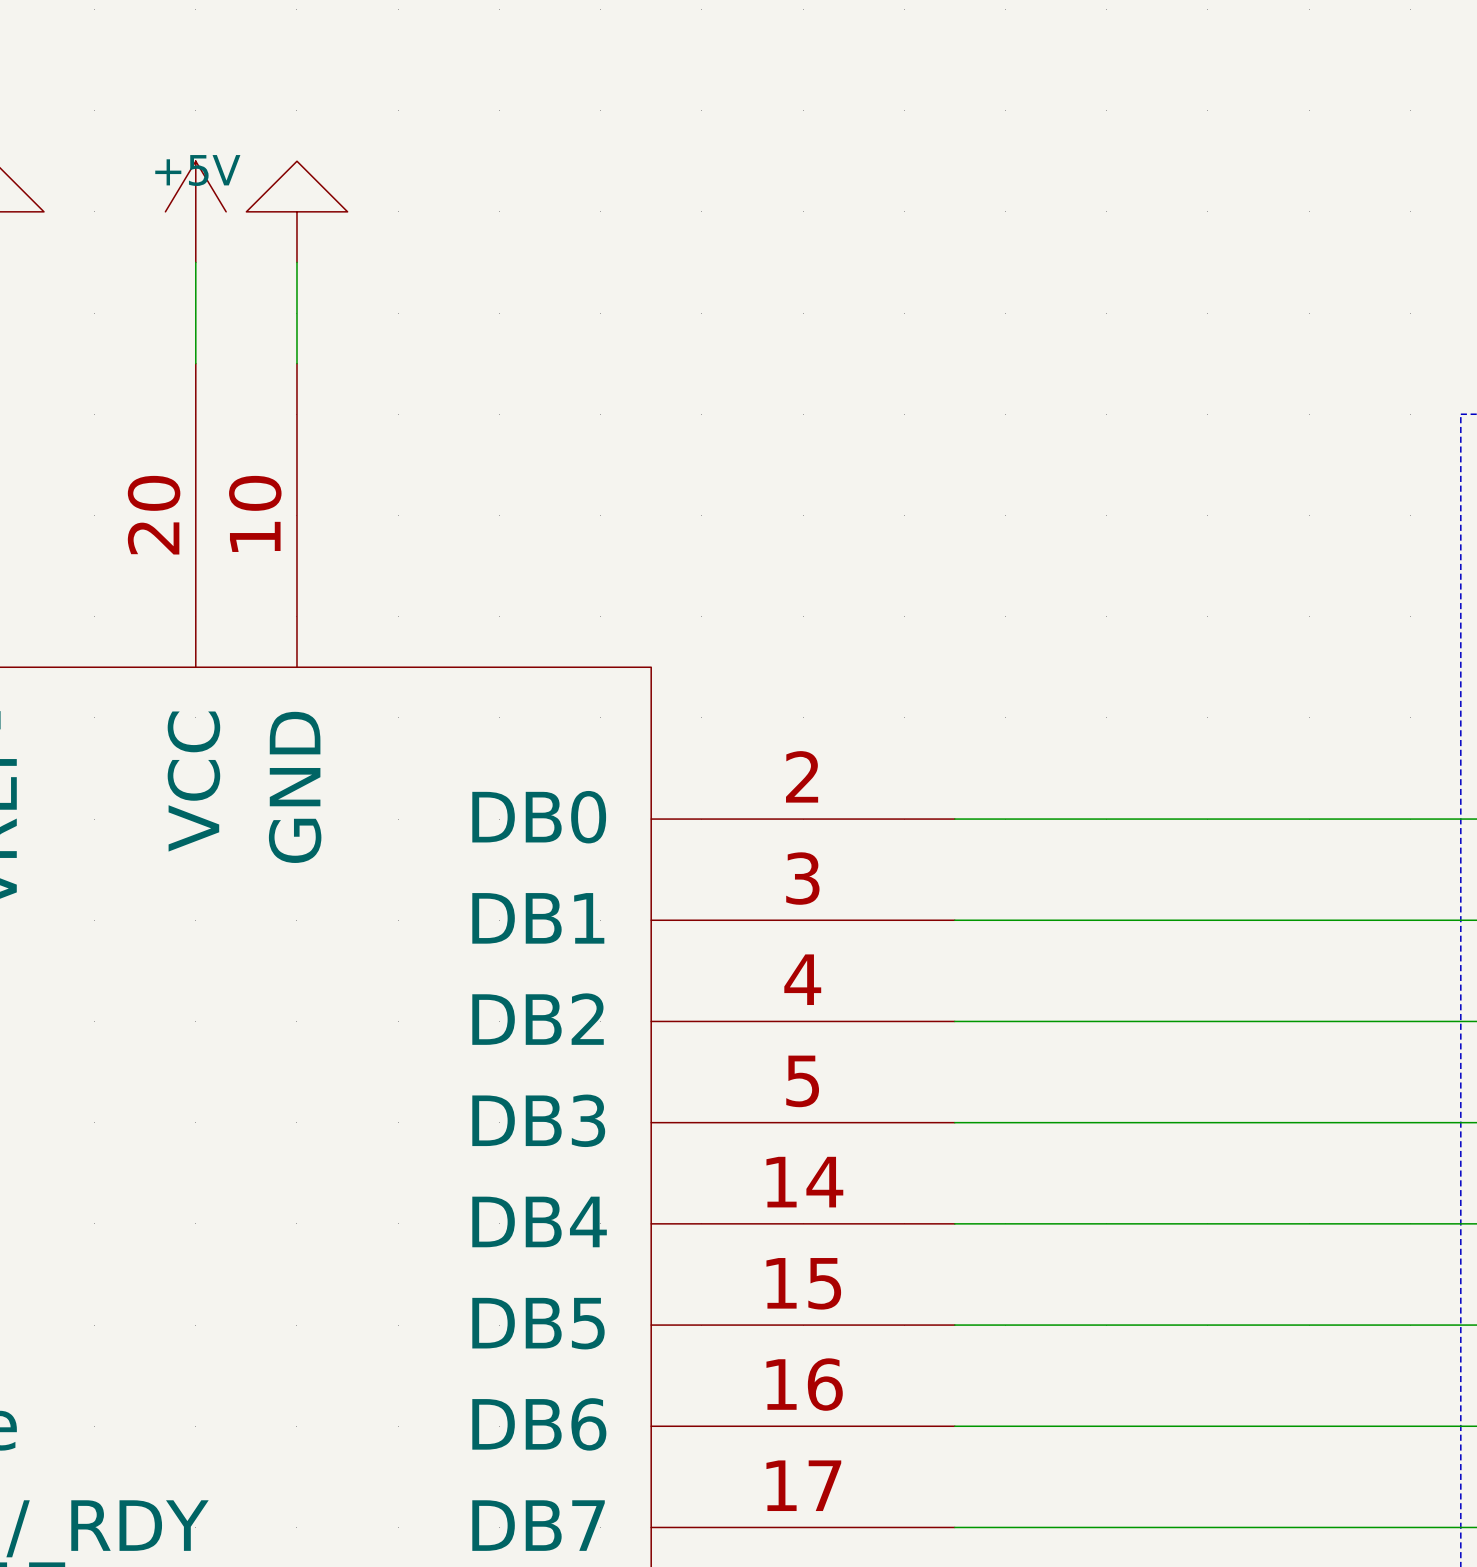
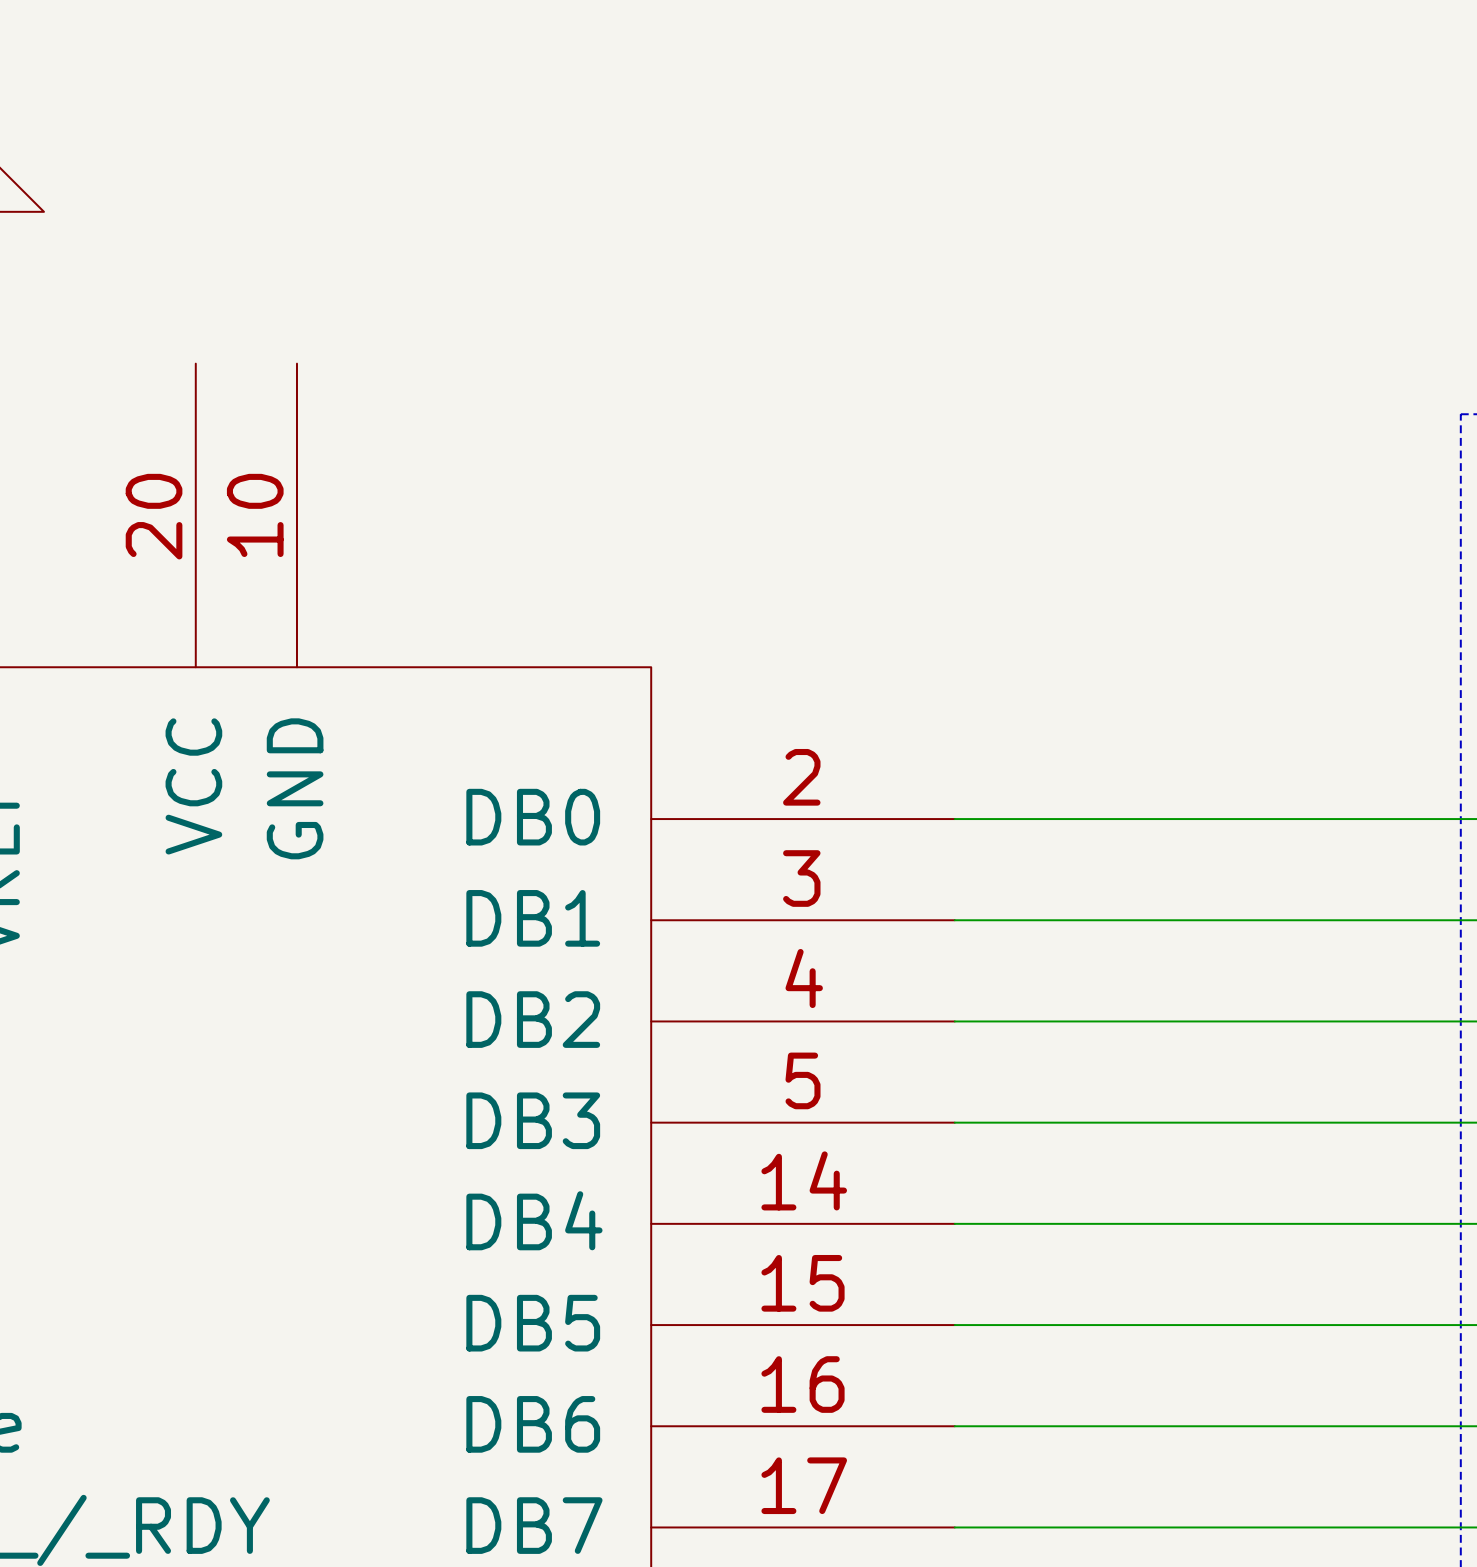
power symbol: +5V (195, 211) -> none
power symbol: (296, 211) -> none
wire: (195, 262) (195, 363) -> none
wire: (296, 262) (296, 363) -> none

